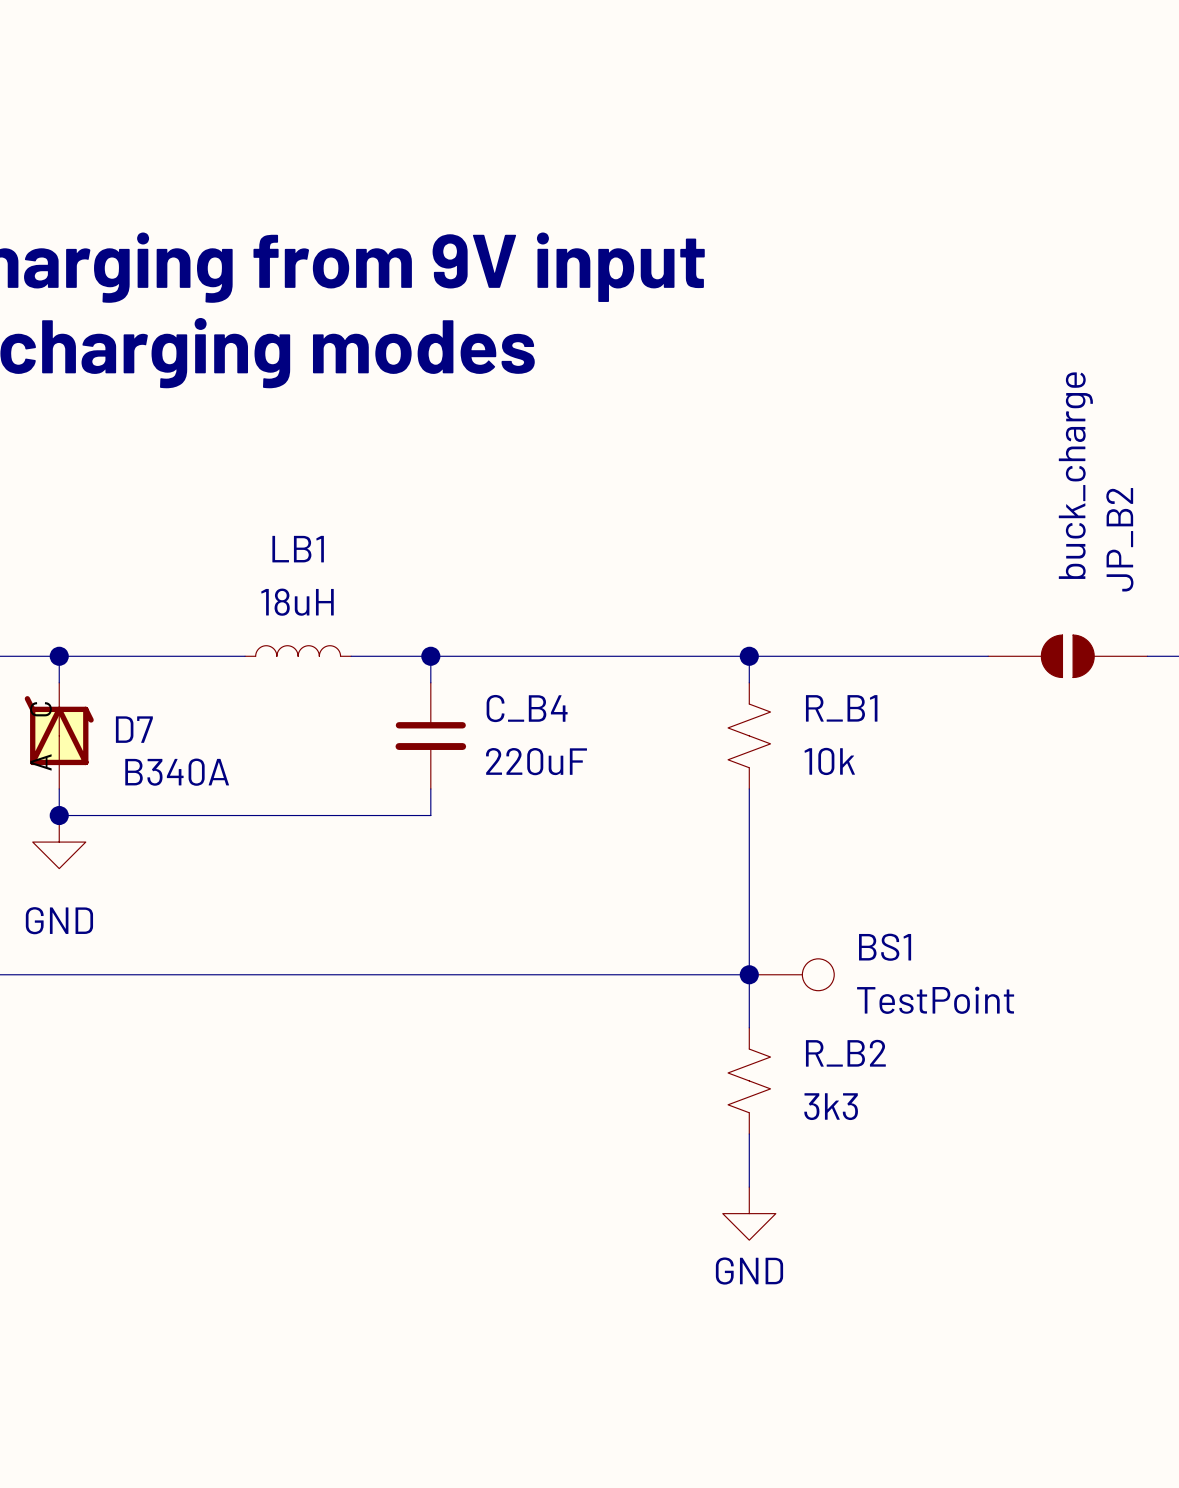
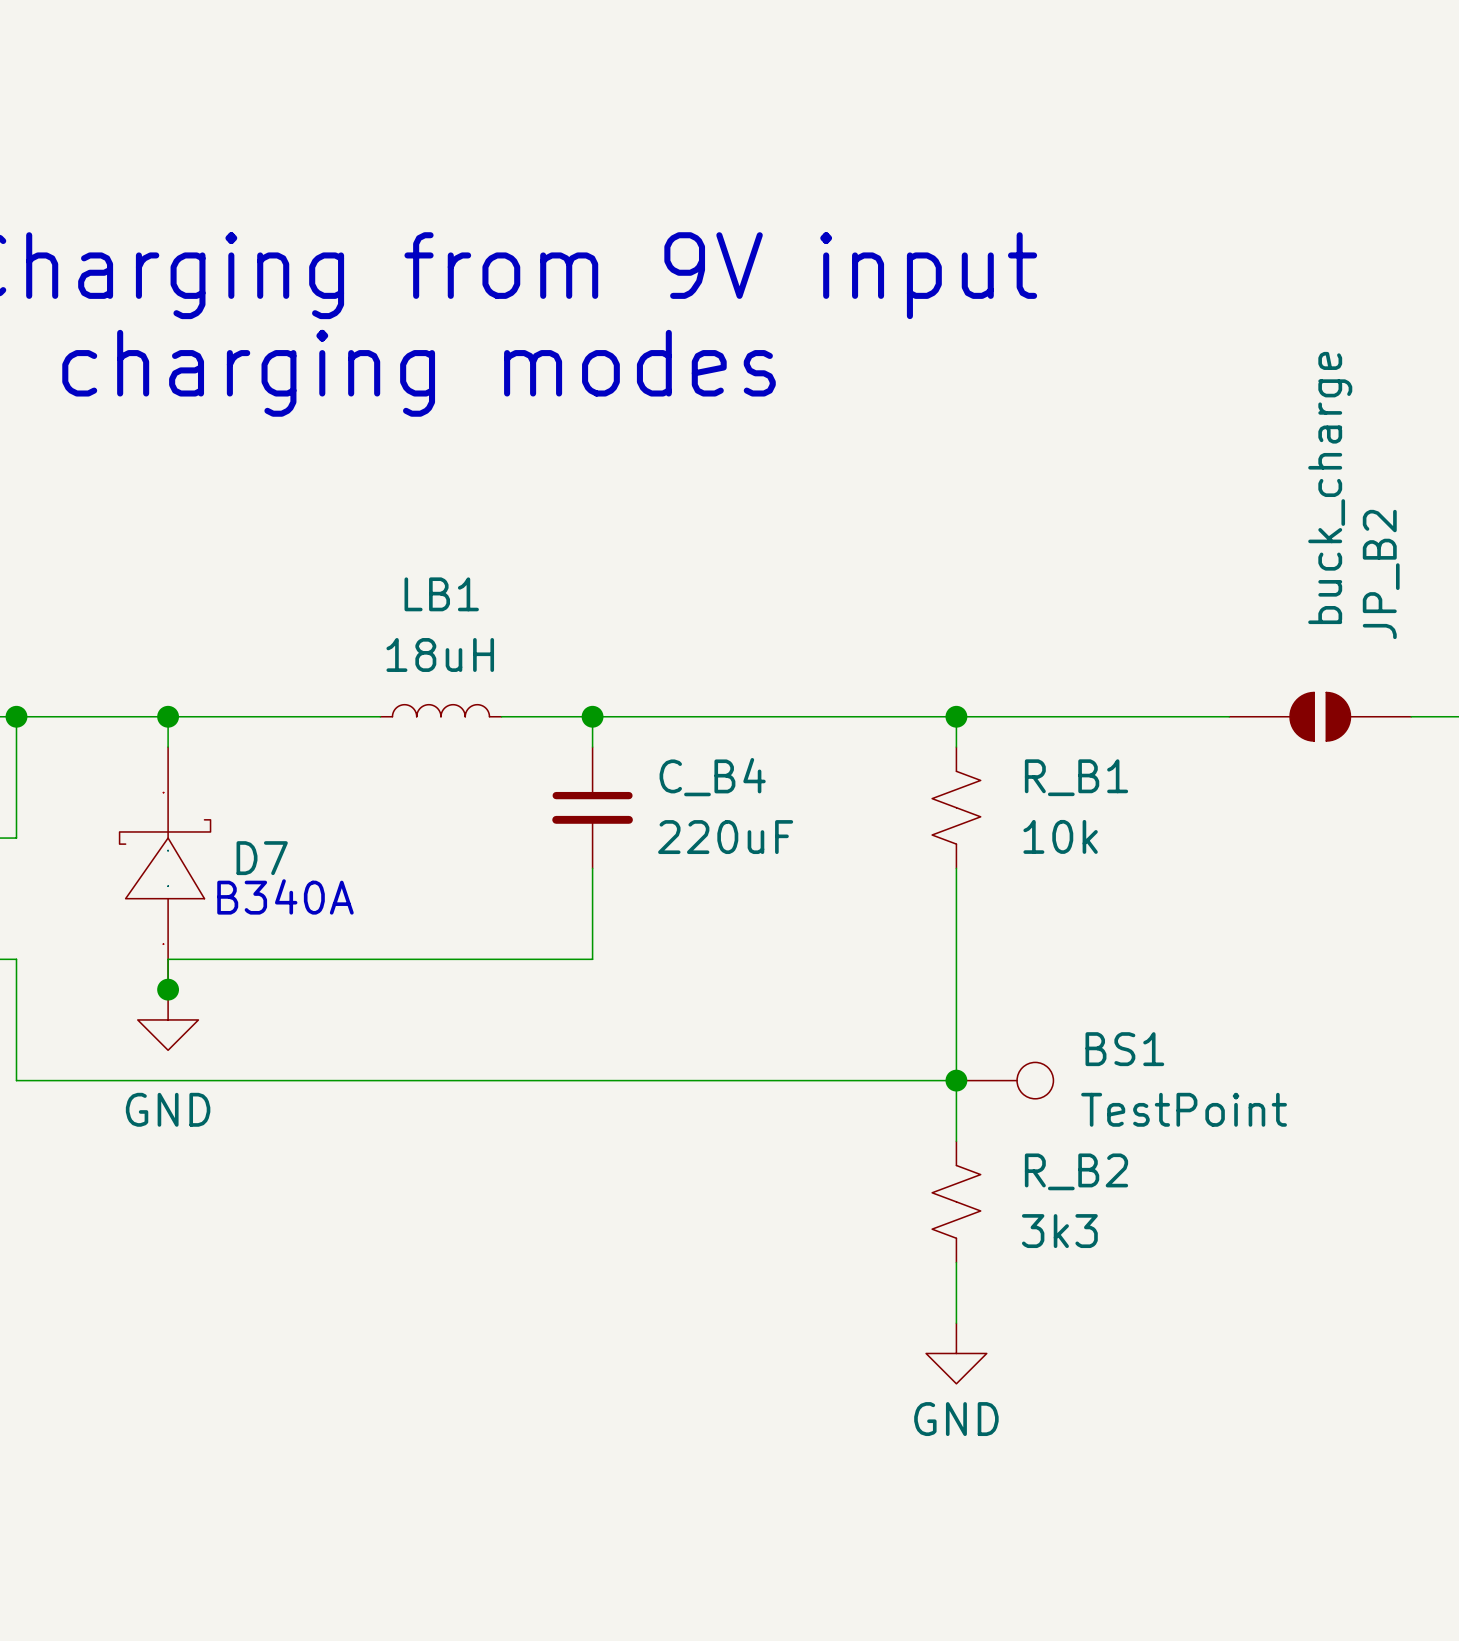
D7 symbol: [24, 682, 94, 789] -> [119, 747, 211, 990]
text position: B340A (177, 772) -> B340A (285, 896)
wire: (59, 788) (59, 815) (430, 815) -> (168, 989) (168, 959) (592, 959) (592, 898)
junction position: (59, 815) -> (168, 989)
power symbol position: GND (59, 842) -> GND (168, 1019)

